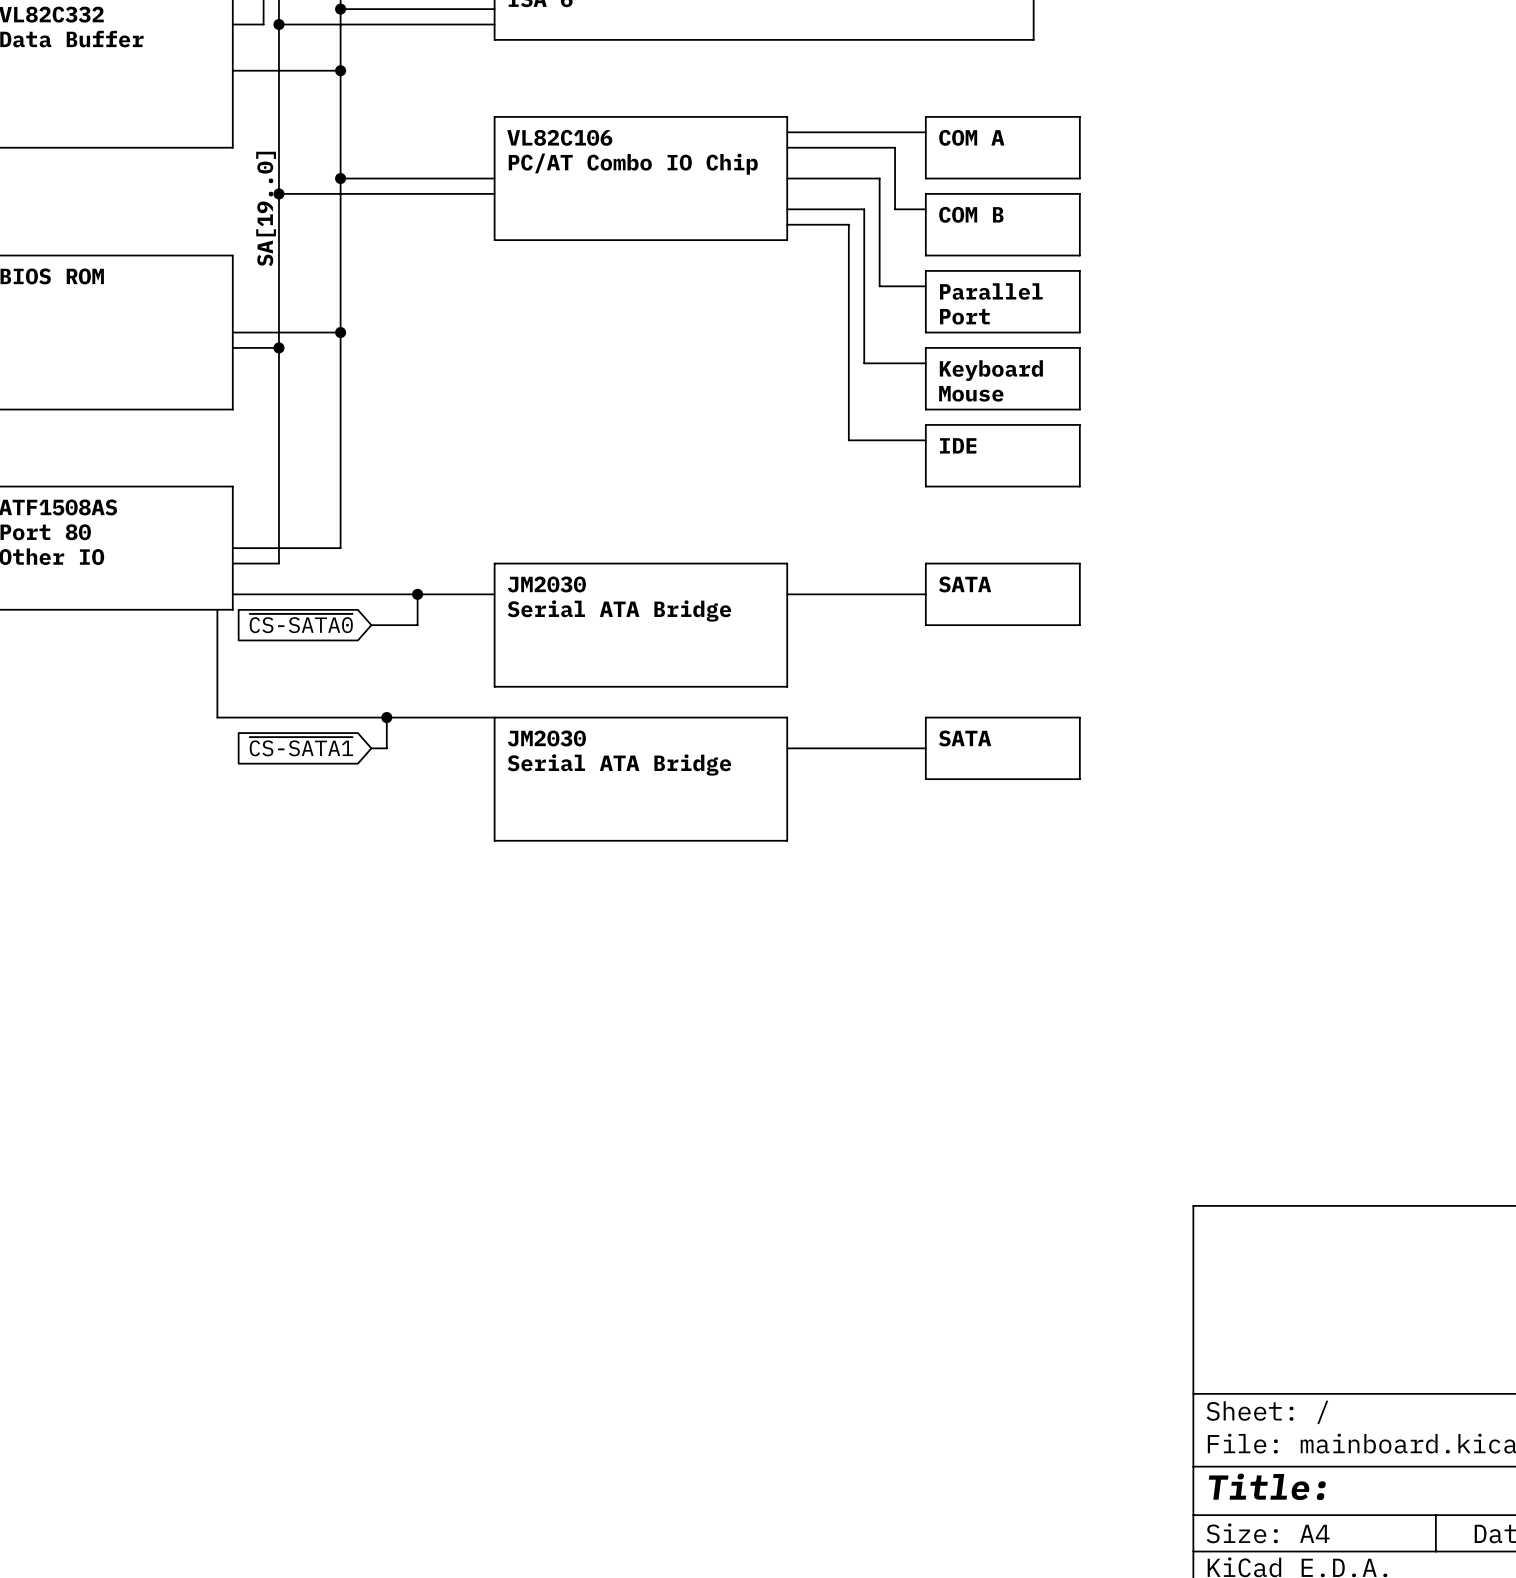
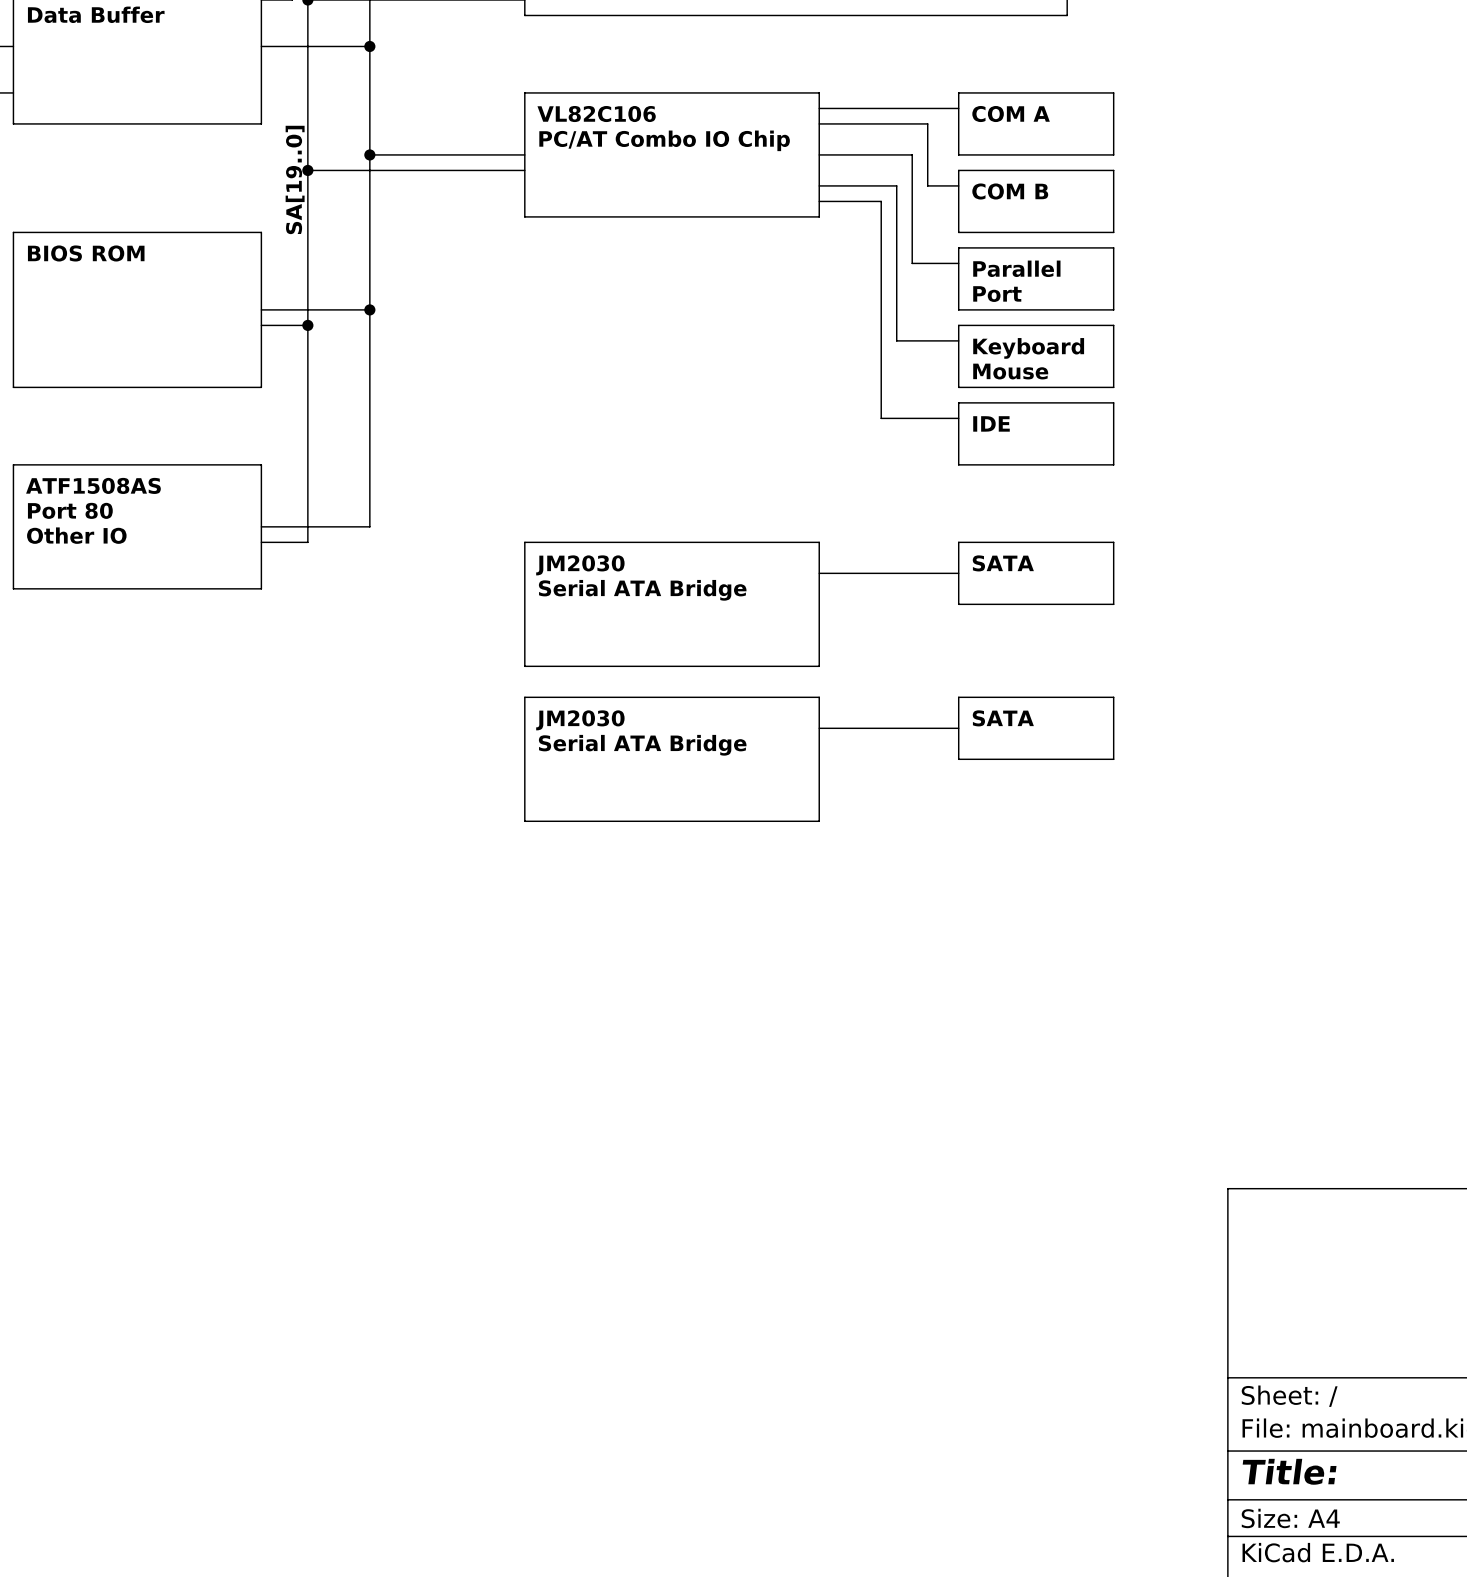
wire: (232, 594) (494, 594) -> none
wire: (417, 594) (417, 625) (371, 625) -> none
junction: (417, 594) -> none
wire: (217, 609) (217, 717) (494, 717) -> none
global label: ~{CS-SATA0} (301, 623) -> none
wire: (386, 717) (386, 748) (371, 748) -> none
junction: (386, 717) -> none
global label: ~{CS-SATA1} (301, 746) -> none

